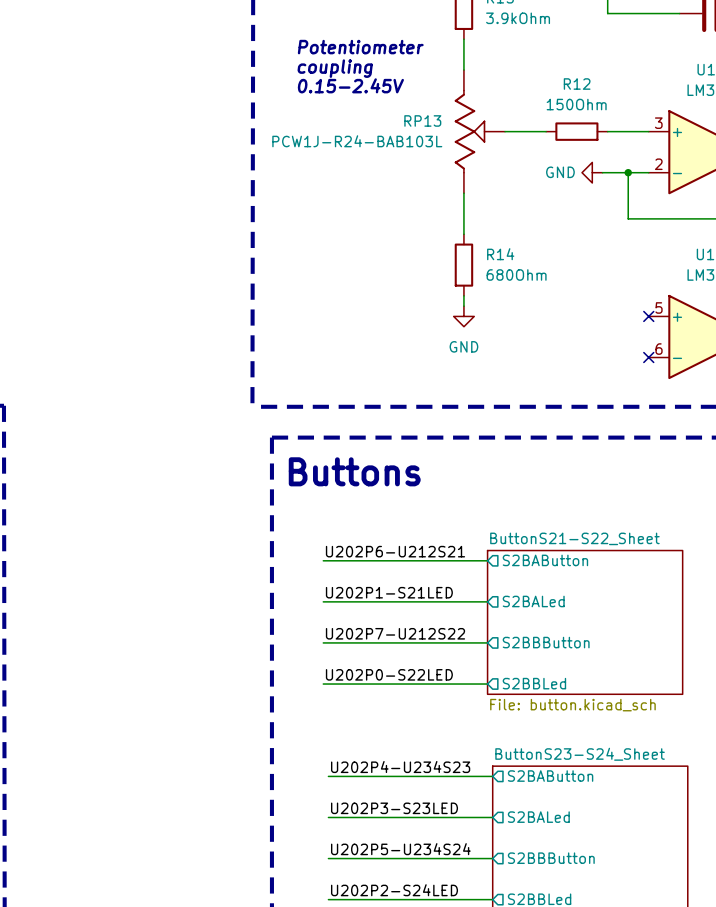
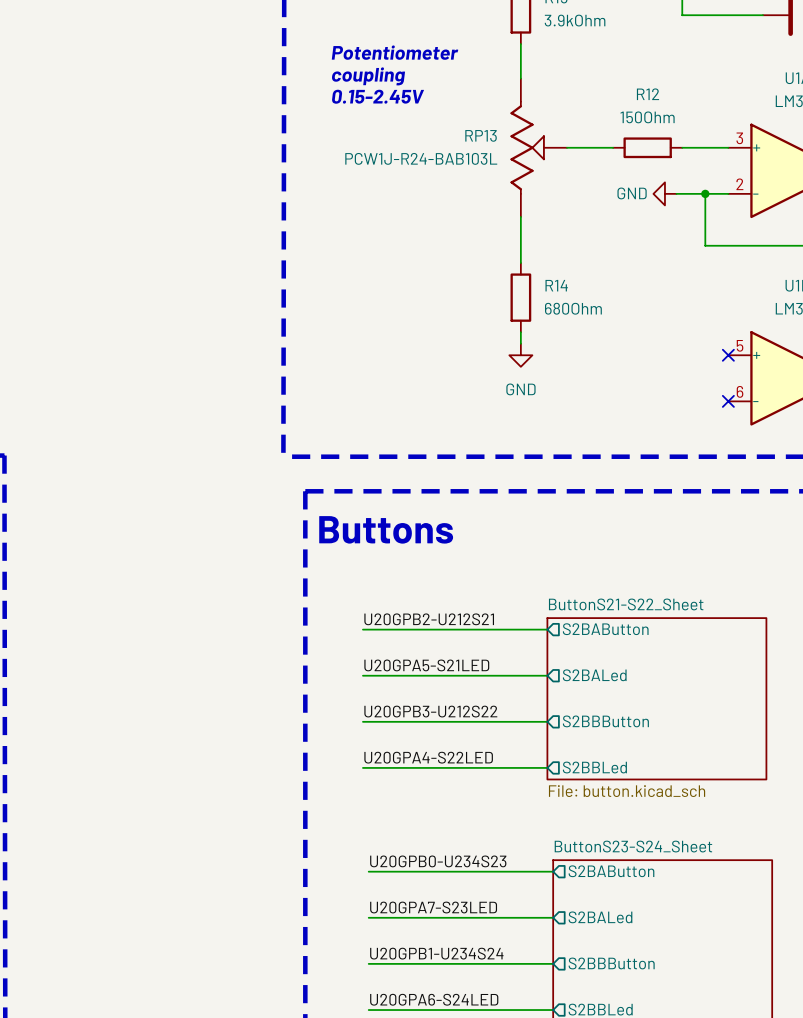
label: U202P6-U212S21 (395, 551) -> U20GPB2-U212S21 (429, 619)
label: U202P1-S21LED (389, 592) -> U20GPA5-S21LED (426, 665)
label: U202P7-U212S22 (395, 633) -> U20GPB3-U212S22 (430, 711)
label: U202P0-S22LED (389, 674) -> U20GPA4-S22LED (428, 757)
label: U202P4-U234S23 (400, 767) -> U20GPB0-U234S23 (438, 861)
label: U202P3-S23LED (394, 808) -> U20GPA7-S23LED (433, 907)
label: U202P5-U234S24 (400, 849) -> U20GPB1-U234S24 (436, 953)
label: U202P2-S24LED (394, 890) -> U20GPA6-S24LED (434, 999)

